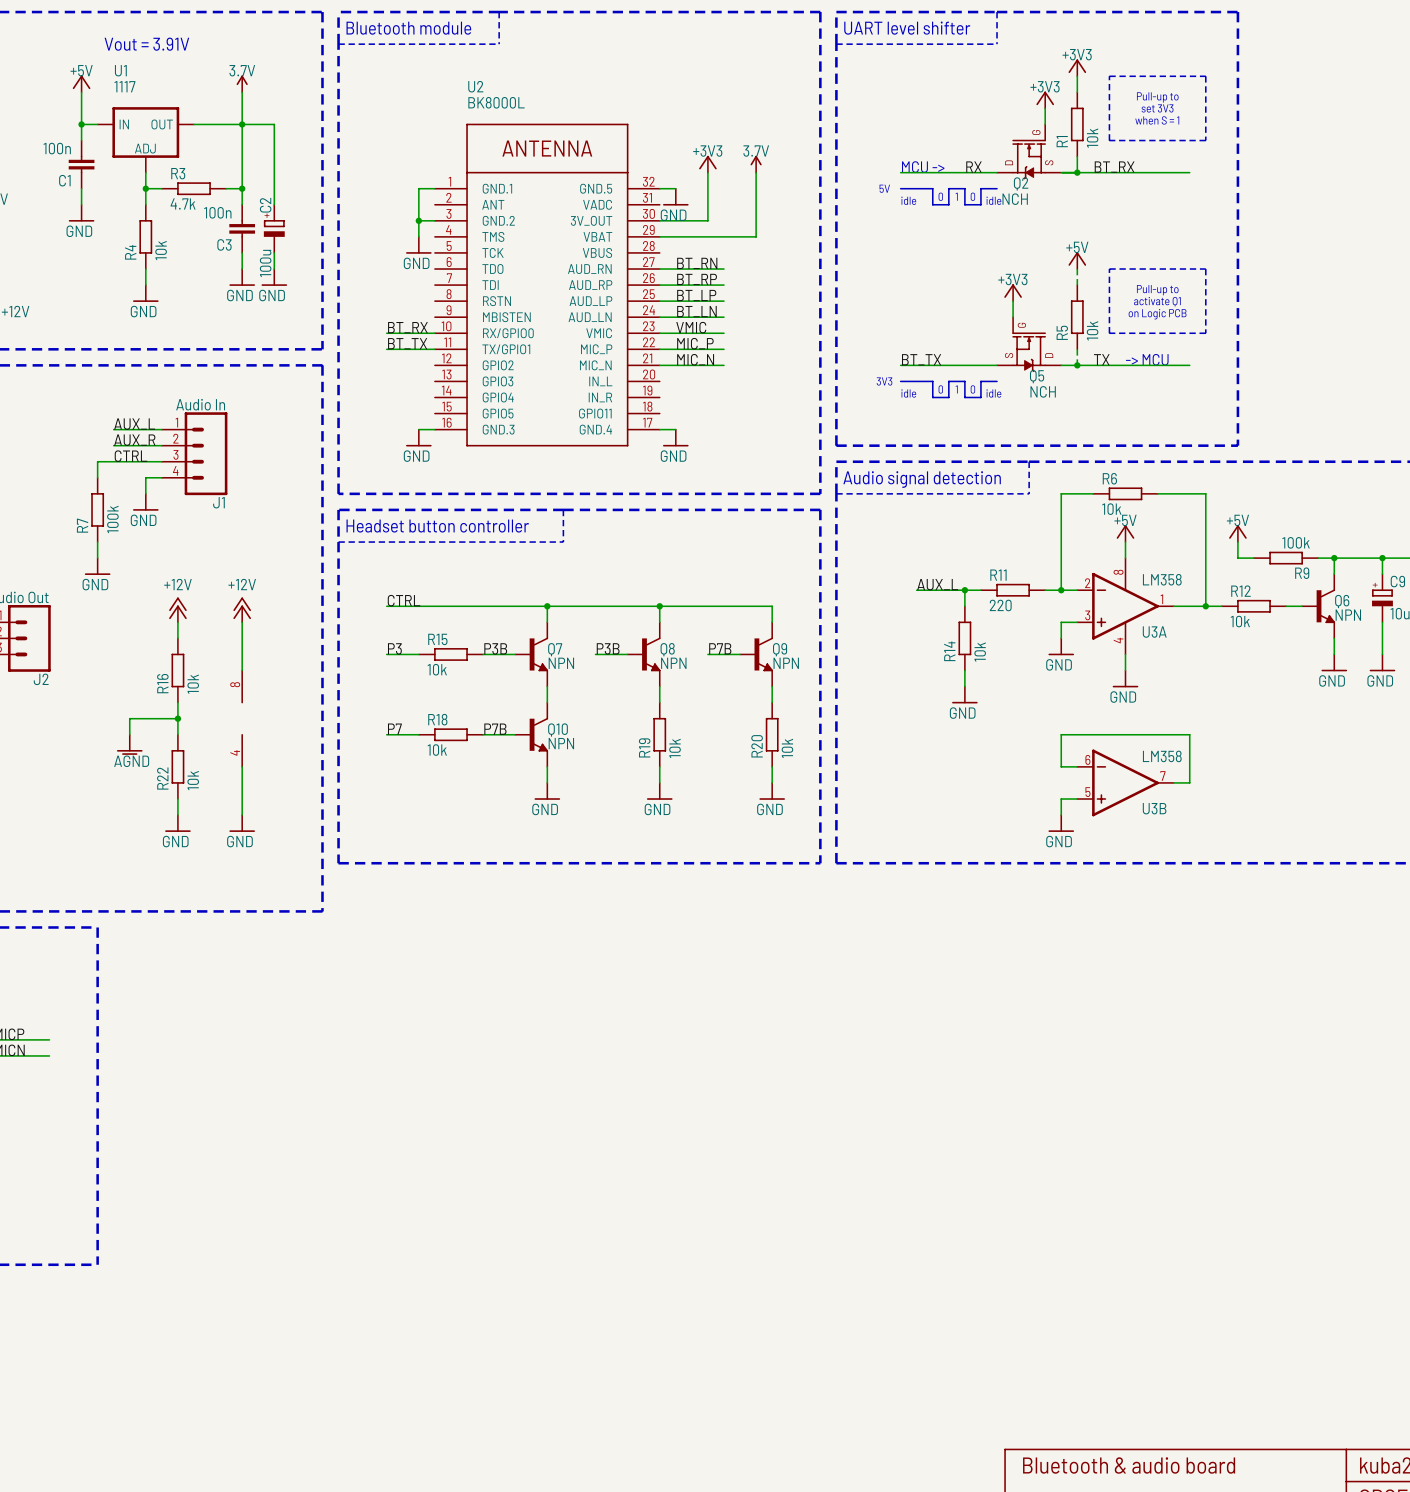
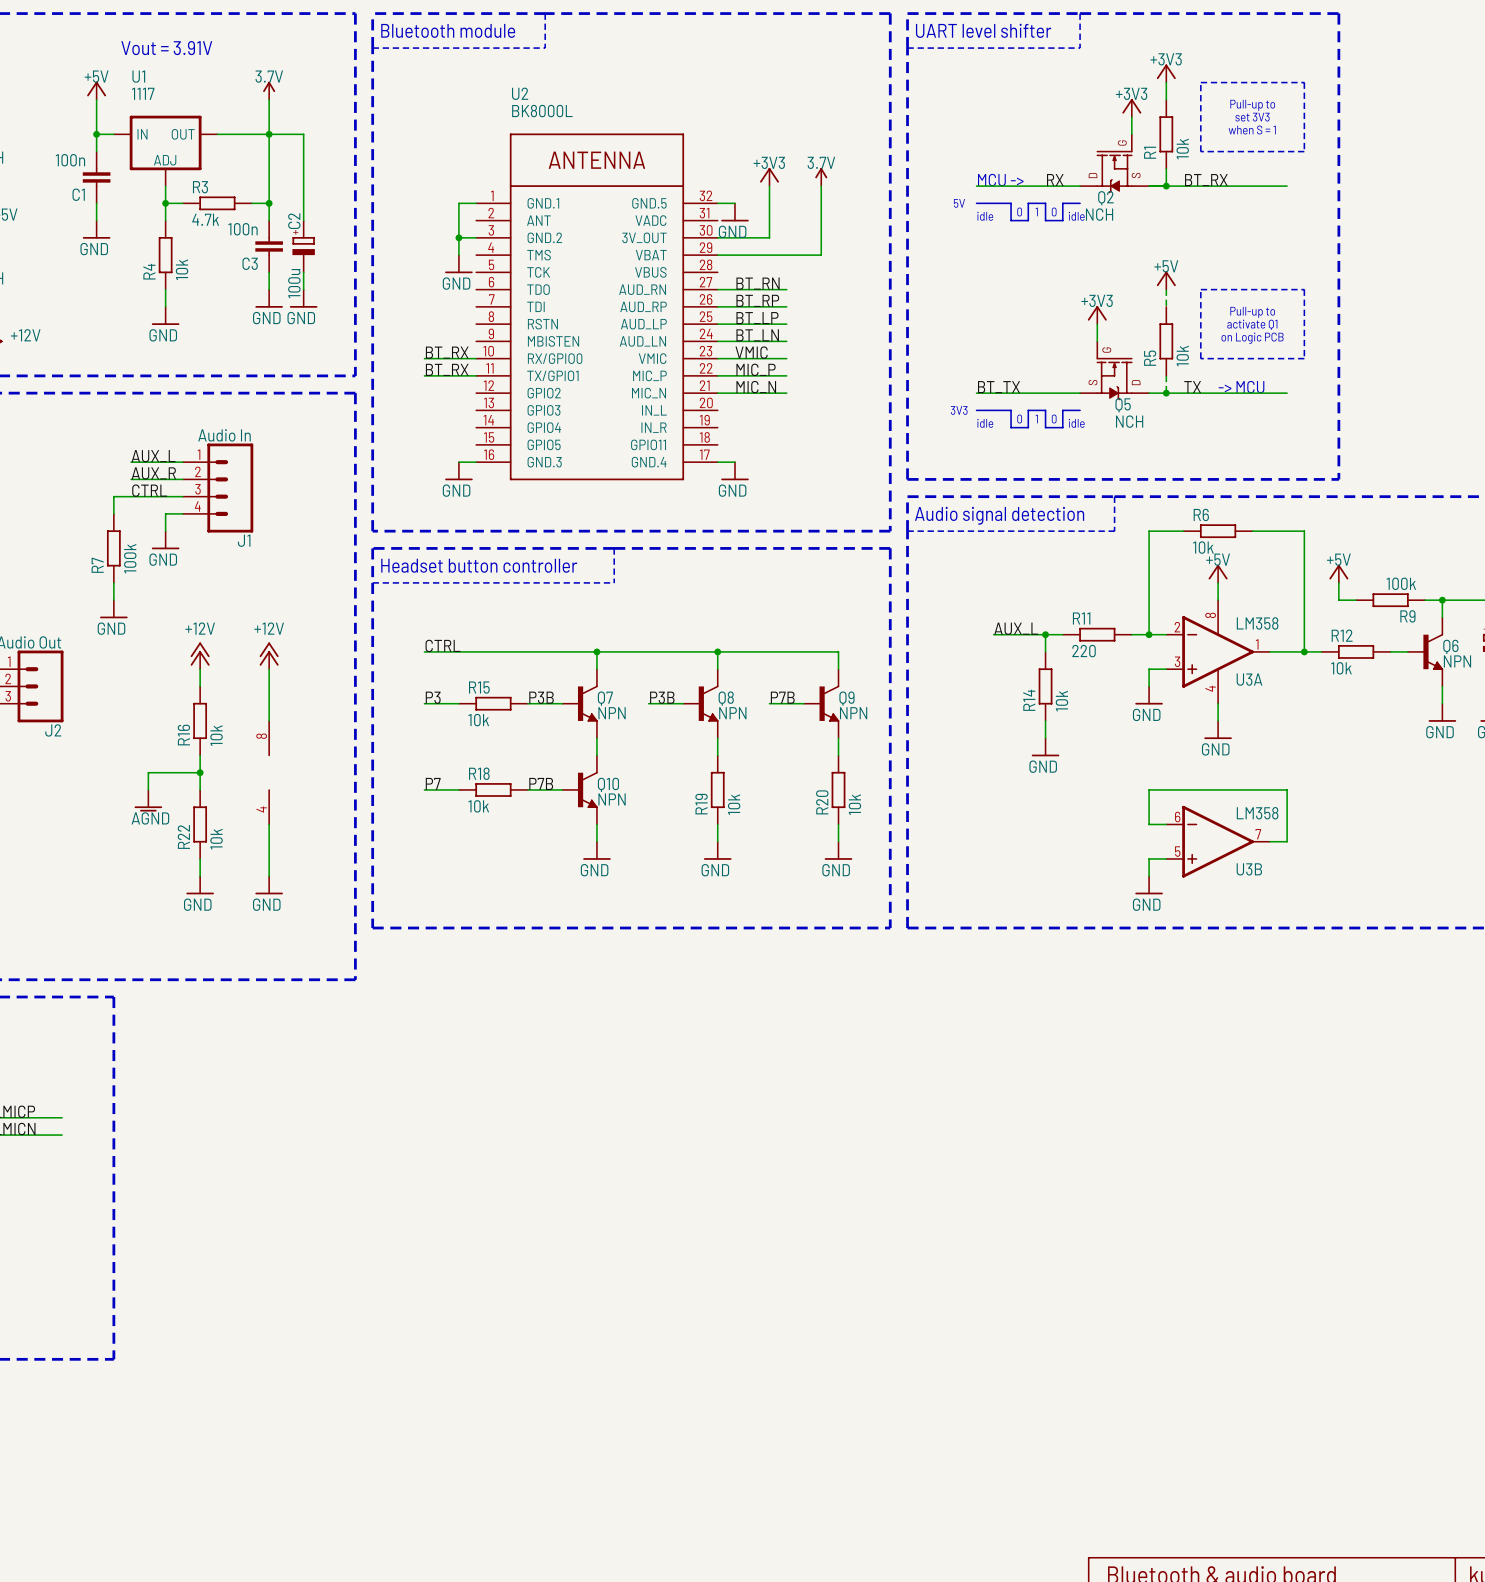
label: BT_TX (407, 343) -> BT_RX (447, 369)

